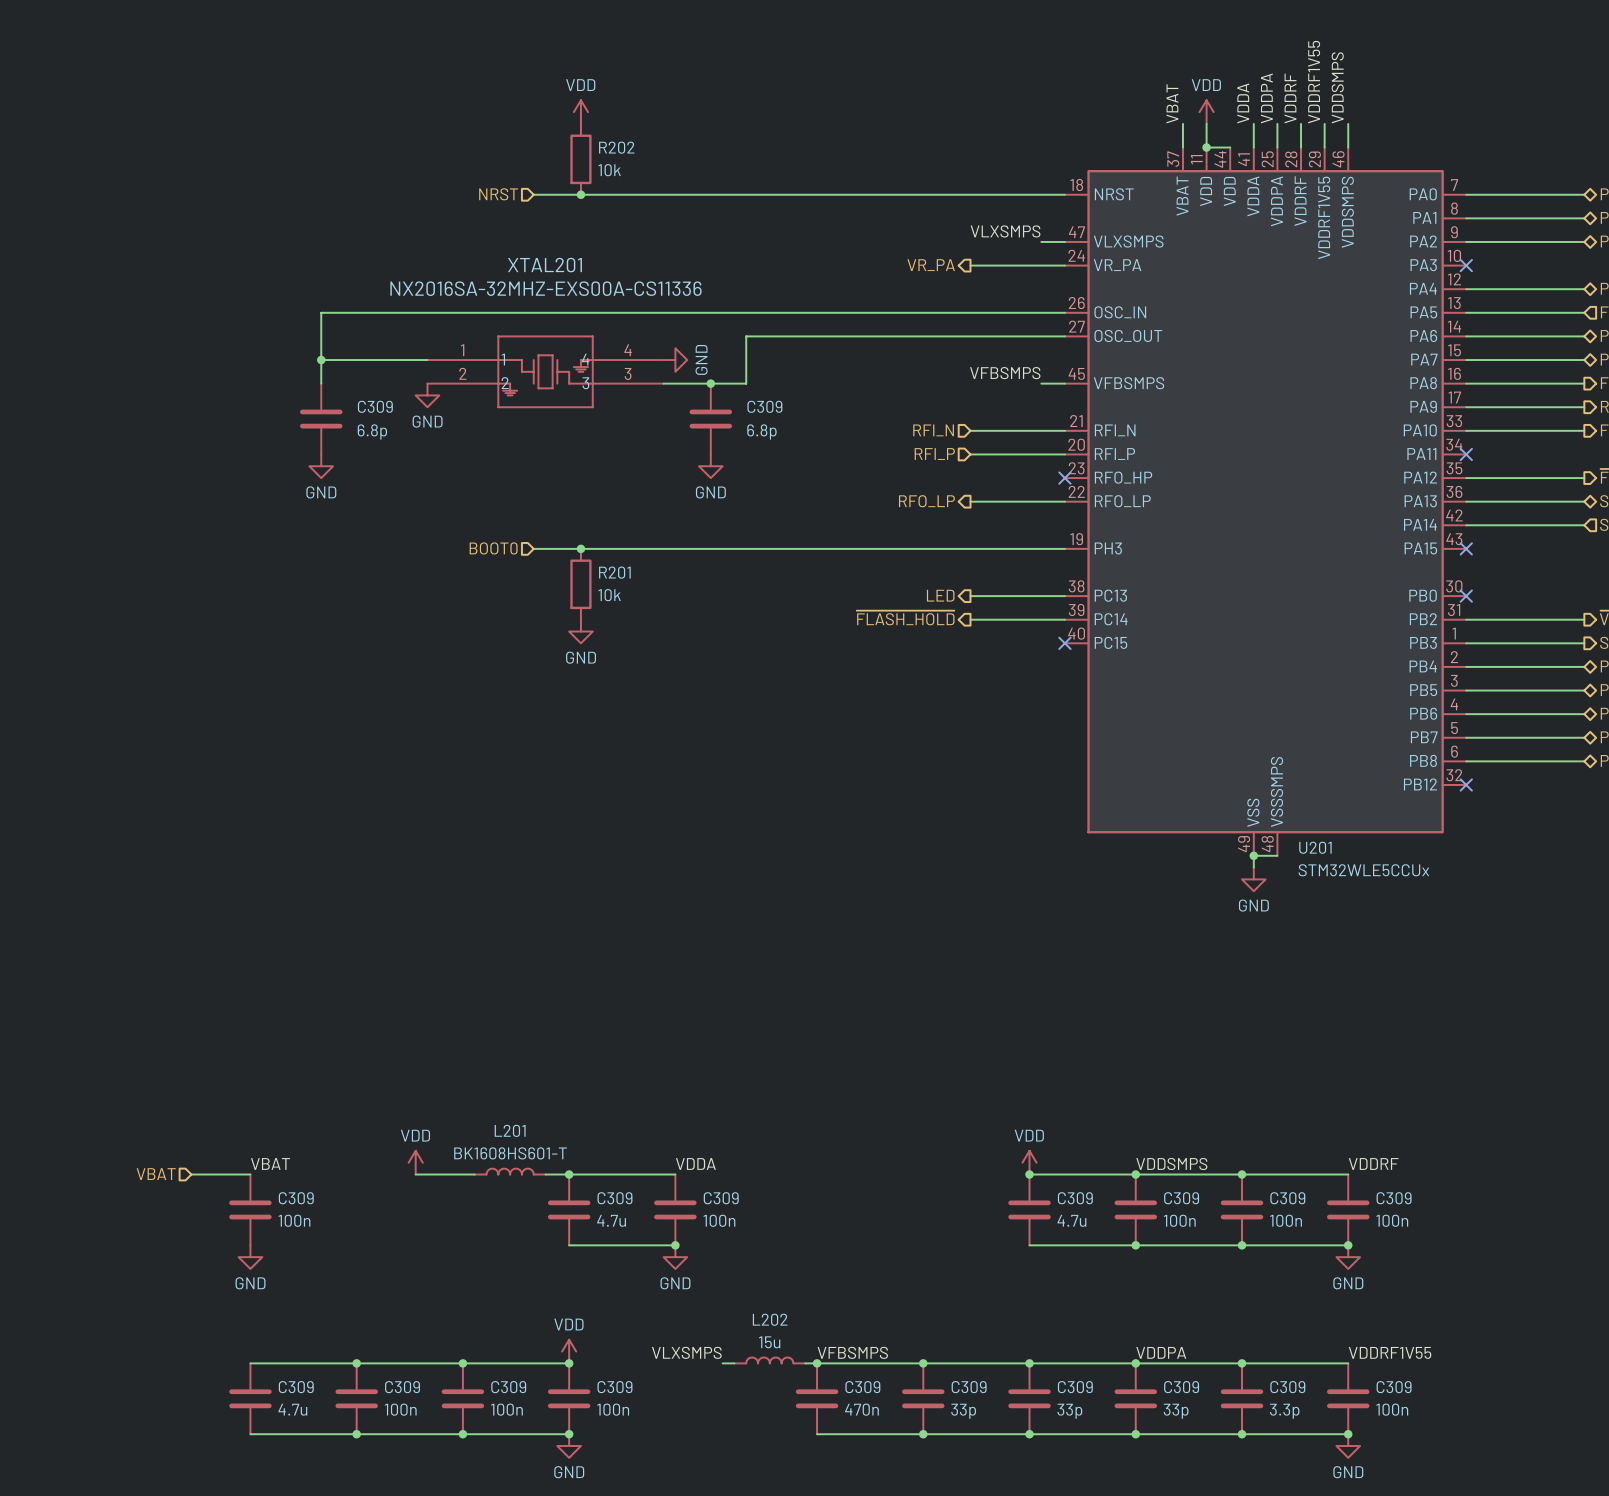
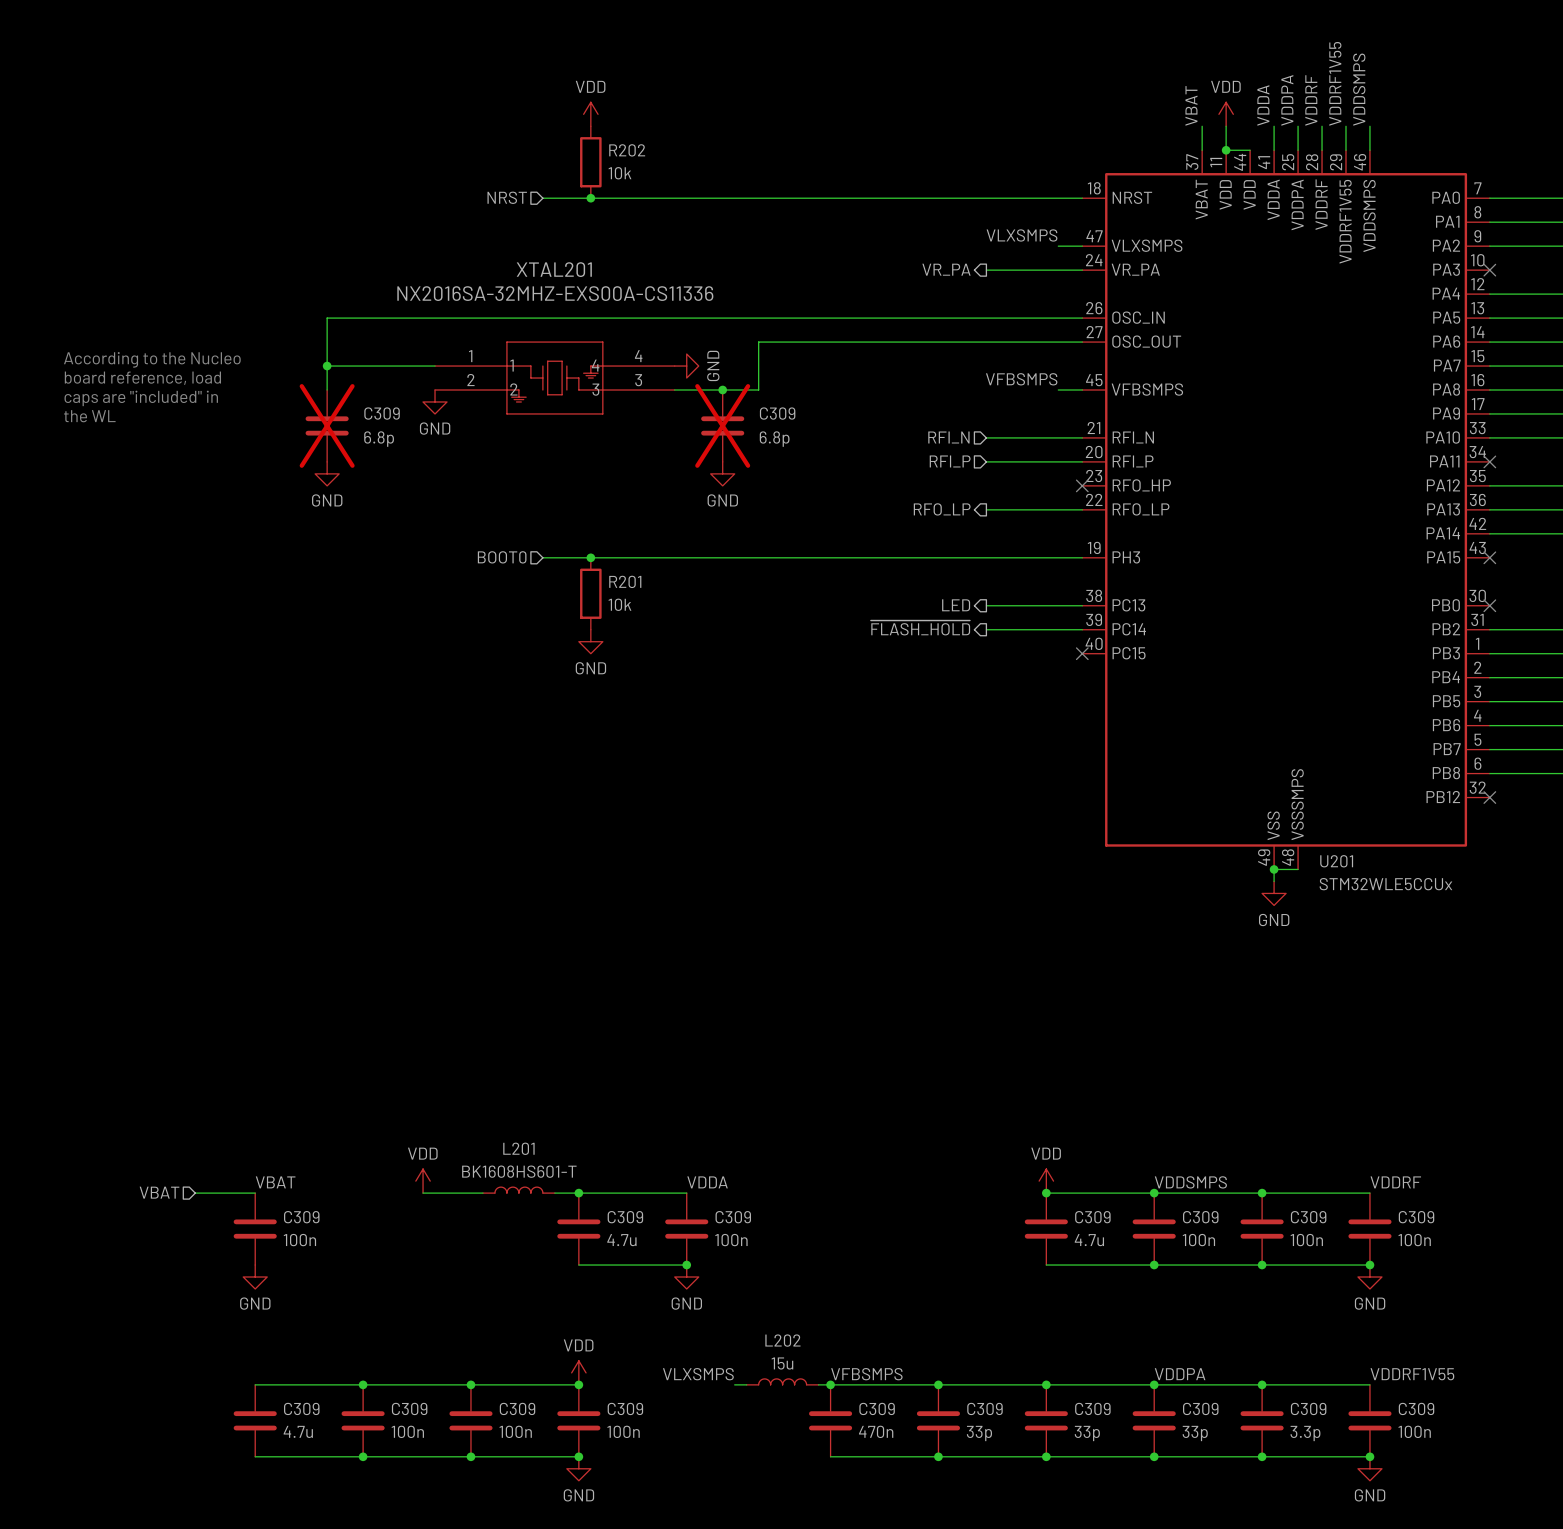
text: none -> According to the Nucleo (152, 359)
text: none -> board reference, load (142, 378)
text: none -> caps are "included" in (141, 398)
text: none -> the WL (89, 416)
C309 do-not-place cross: none -> (327, 425)
C309 do-not-place cross: none -> (722, 425)

